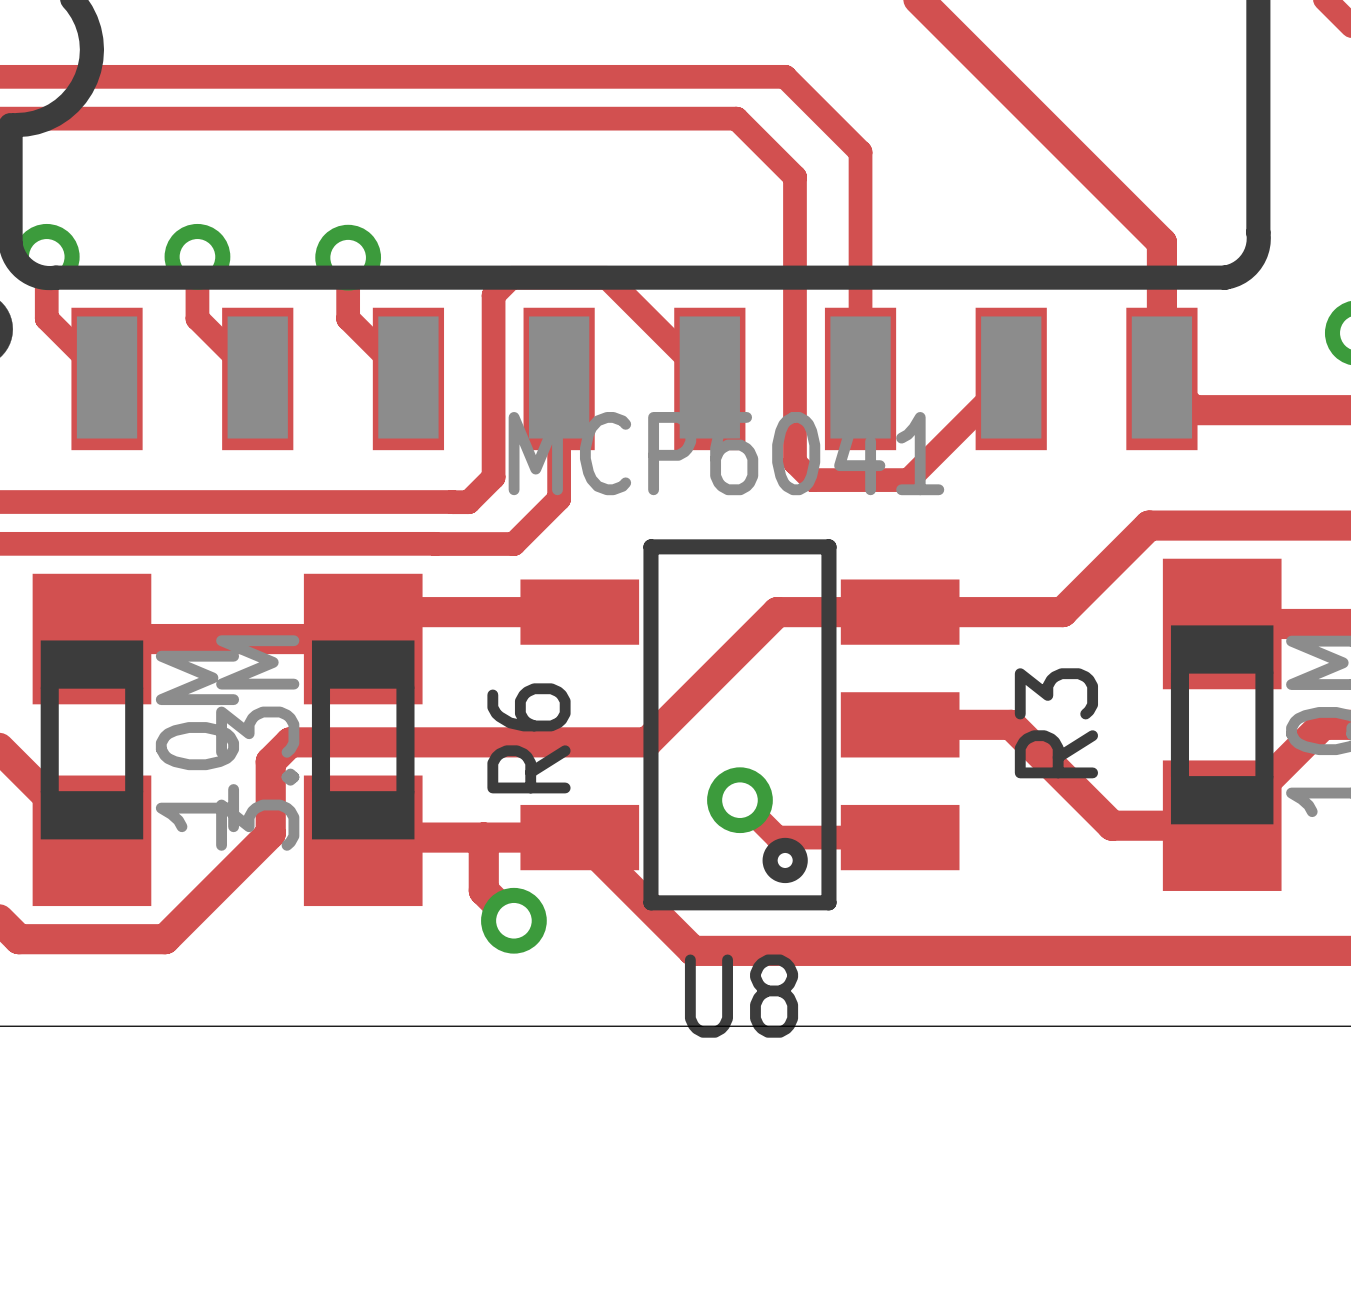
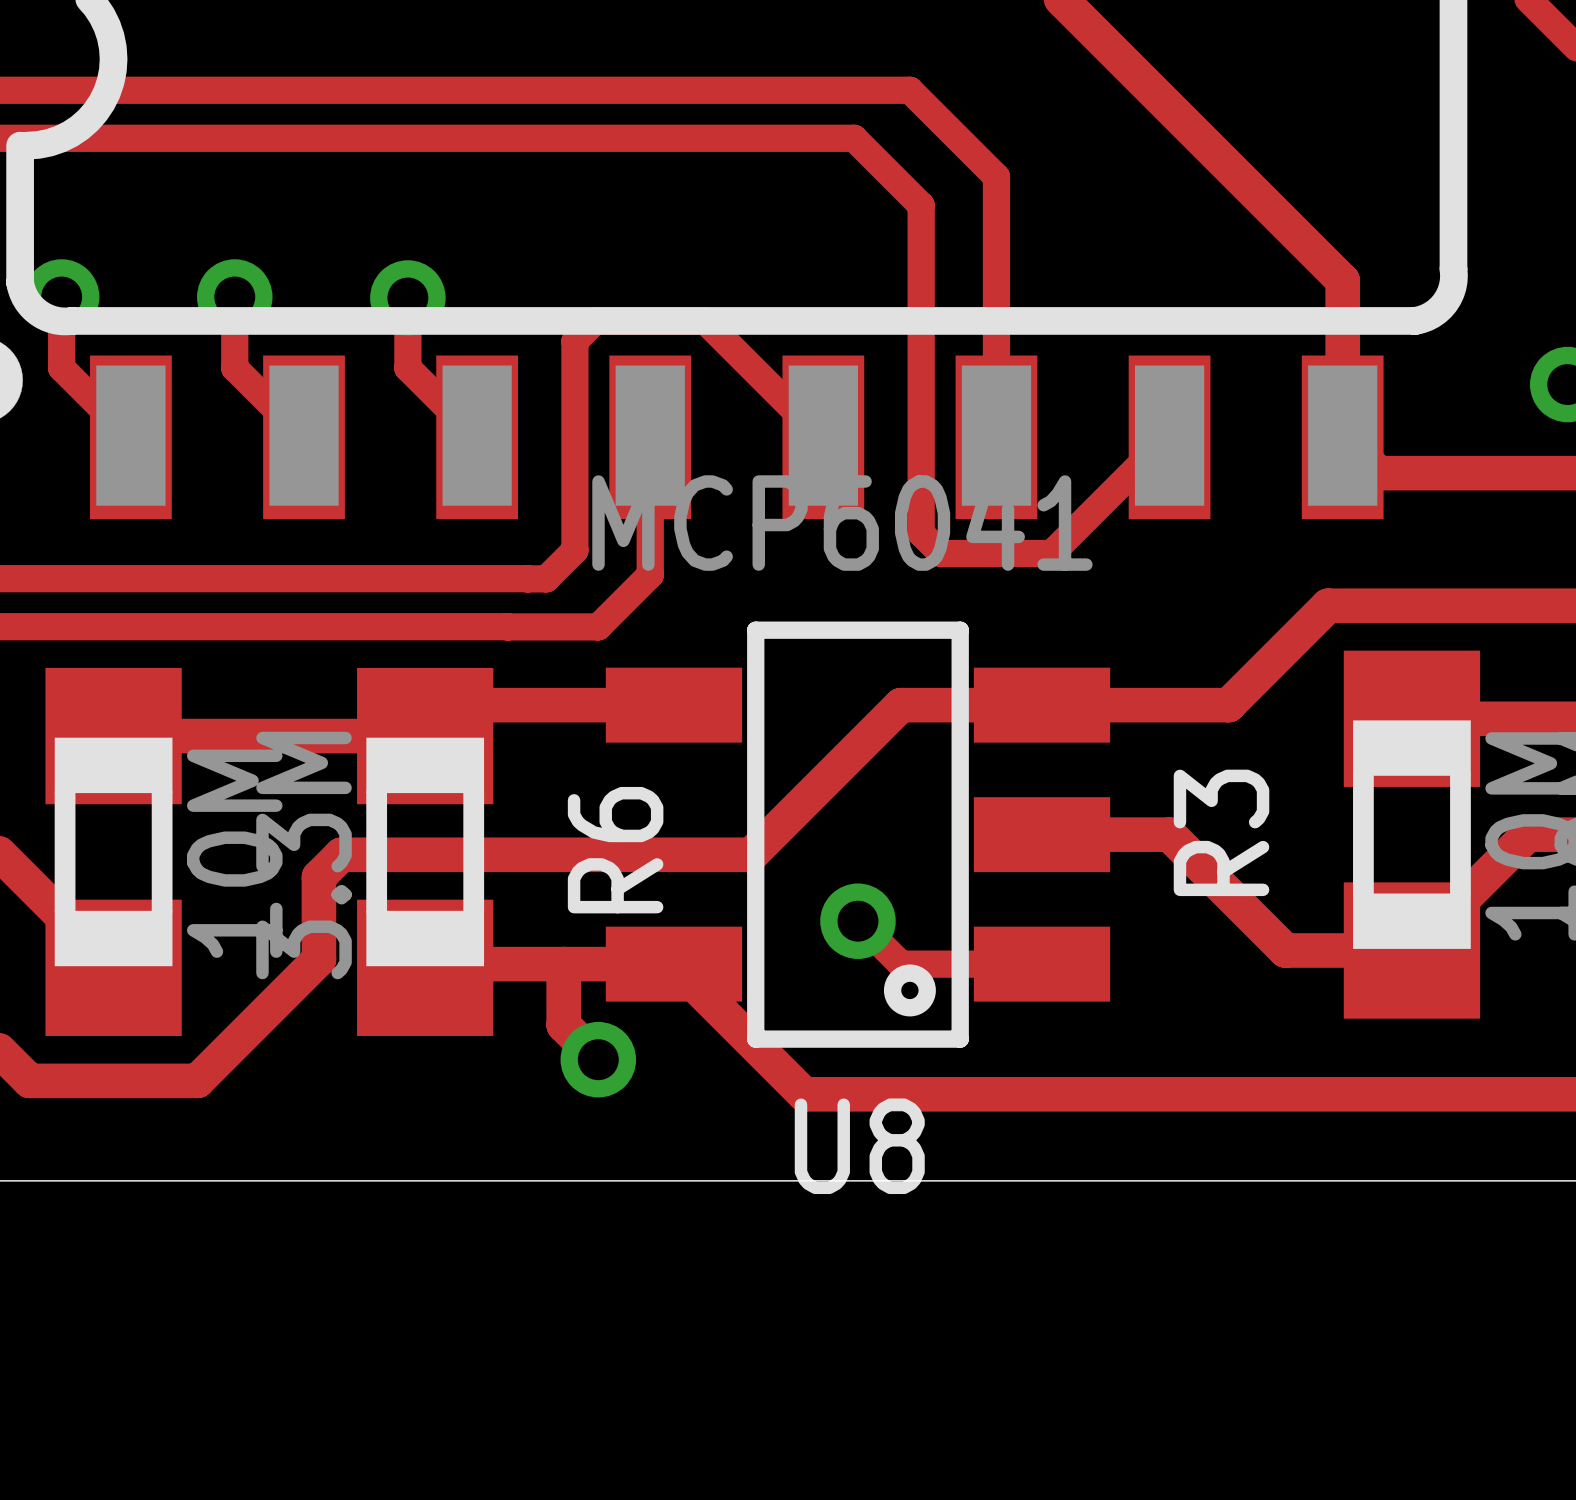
R3 footprint: [1162, 558, 1282, 891] -> [1343, 650, 1481, 1019]
part footprint: [32, 573, 152, 907] -> [45, 667, 182, 1036]
R6 footprint: [303, 573, 423, 907] -> [357, 667, 494, 1036]

